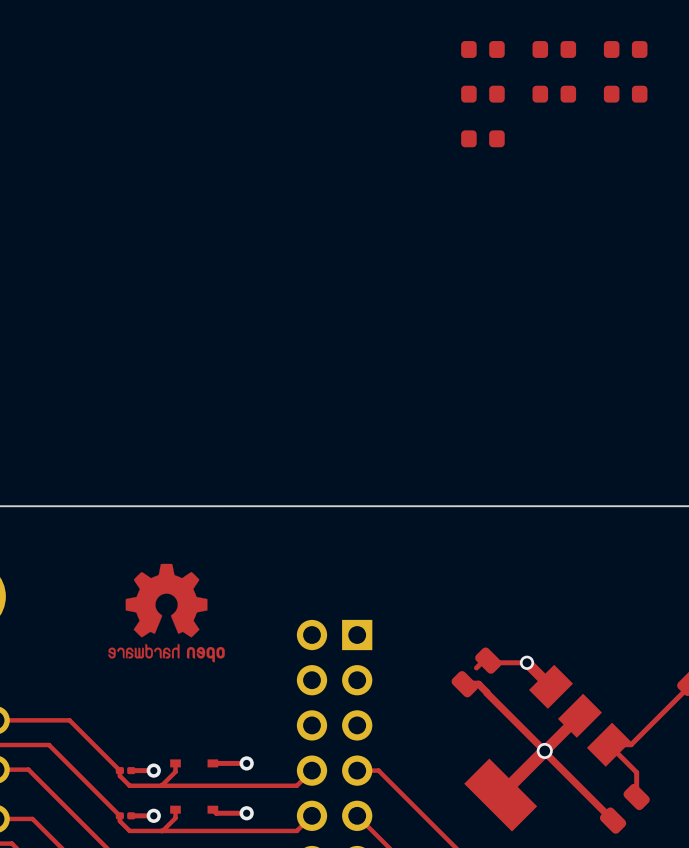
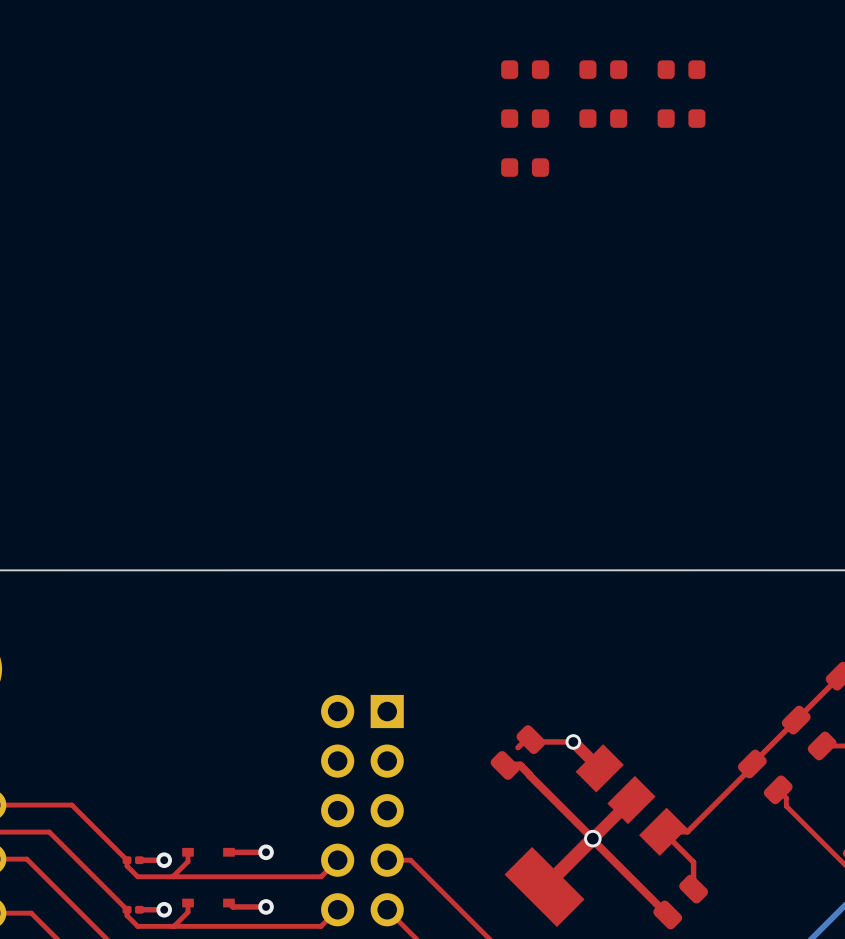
drawing: [108, 563, 225, 663] -> none

